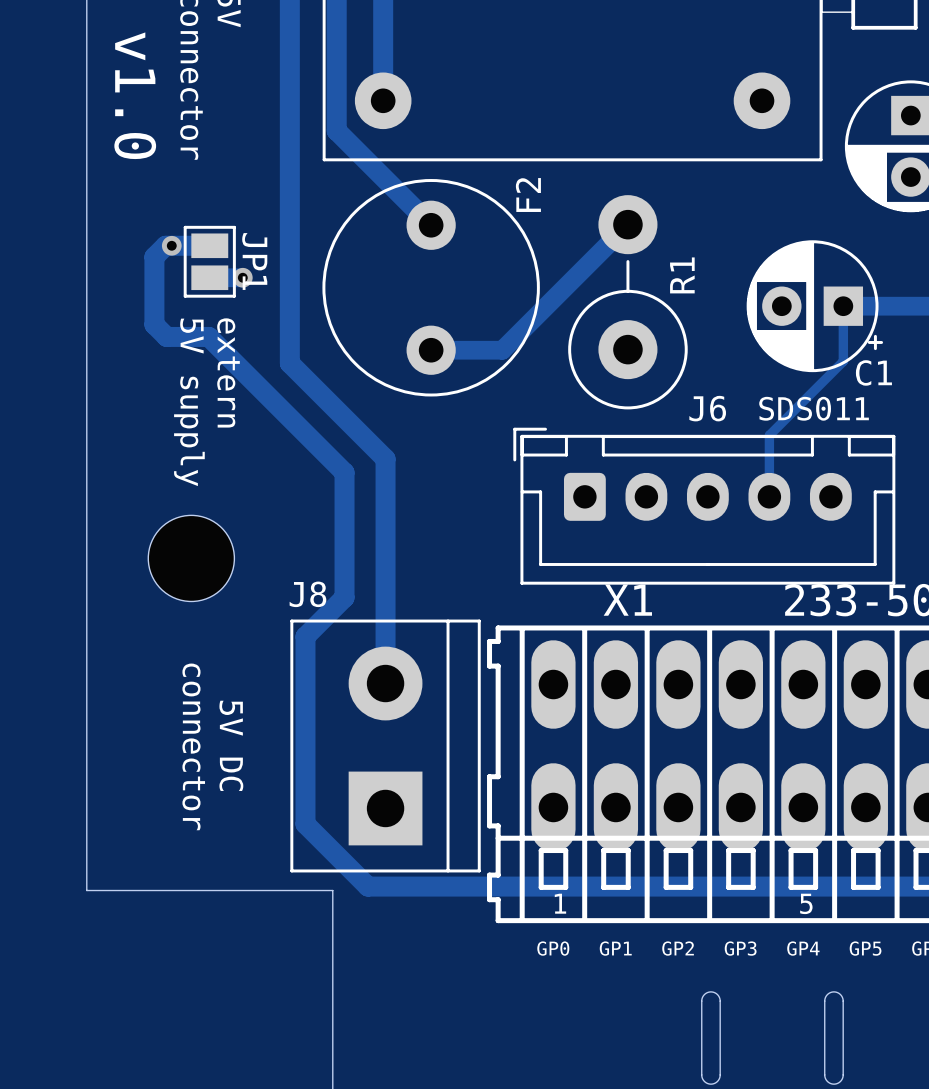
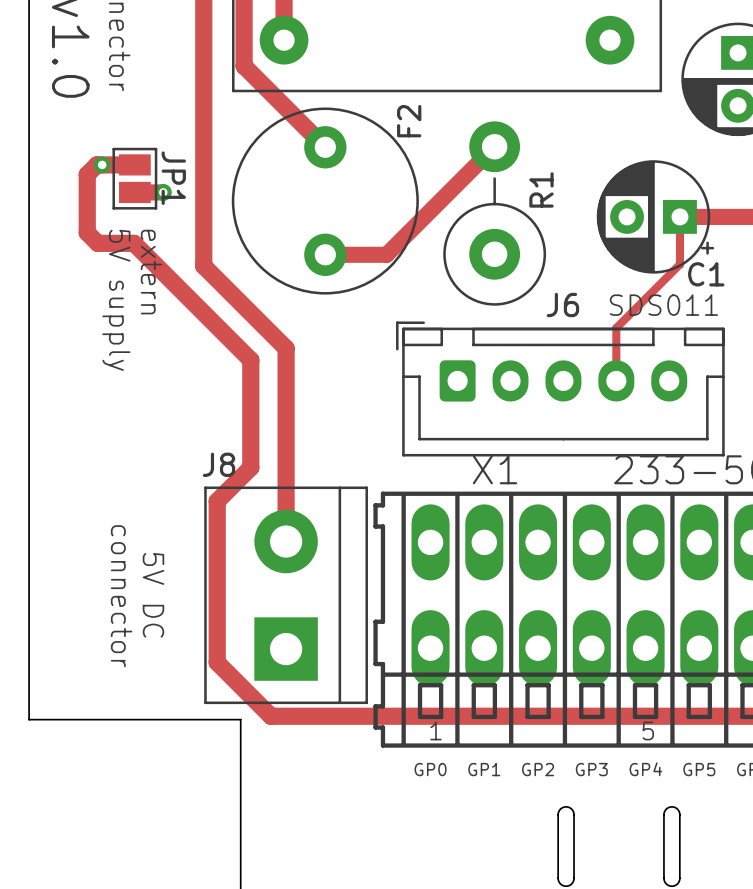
part: (191, 558) -> none

